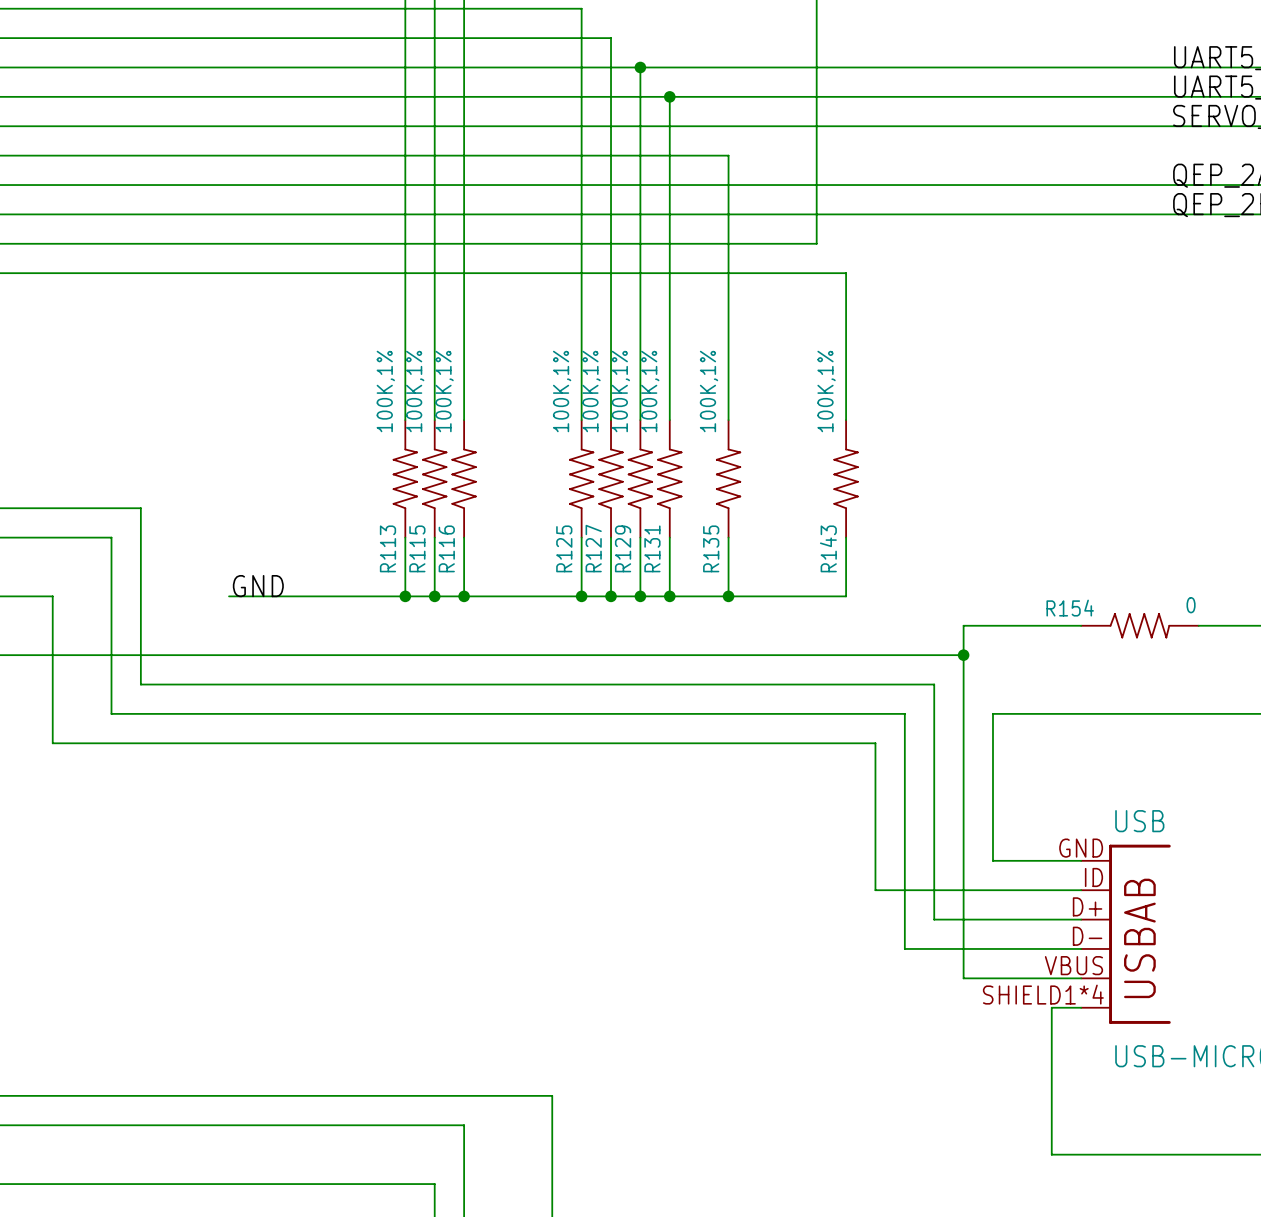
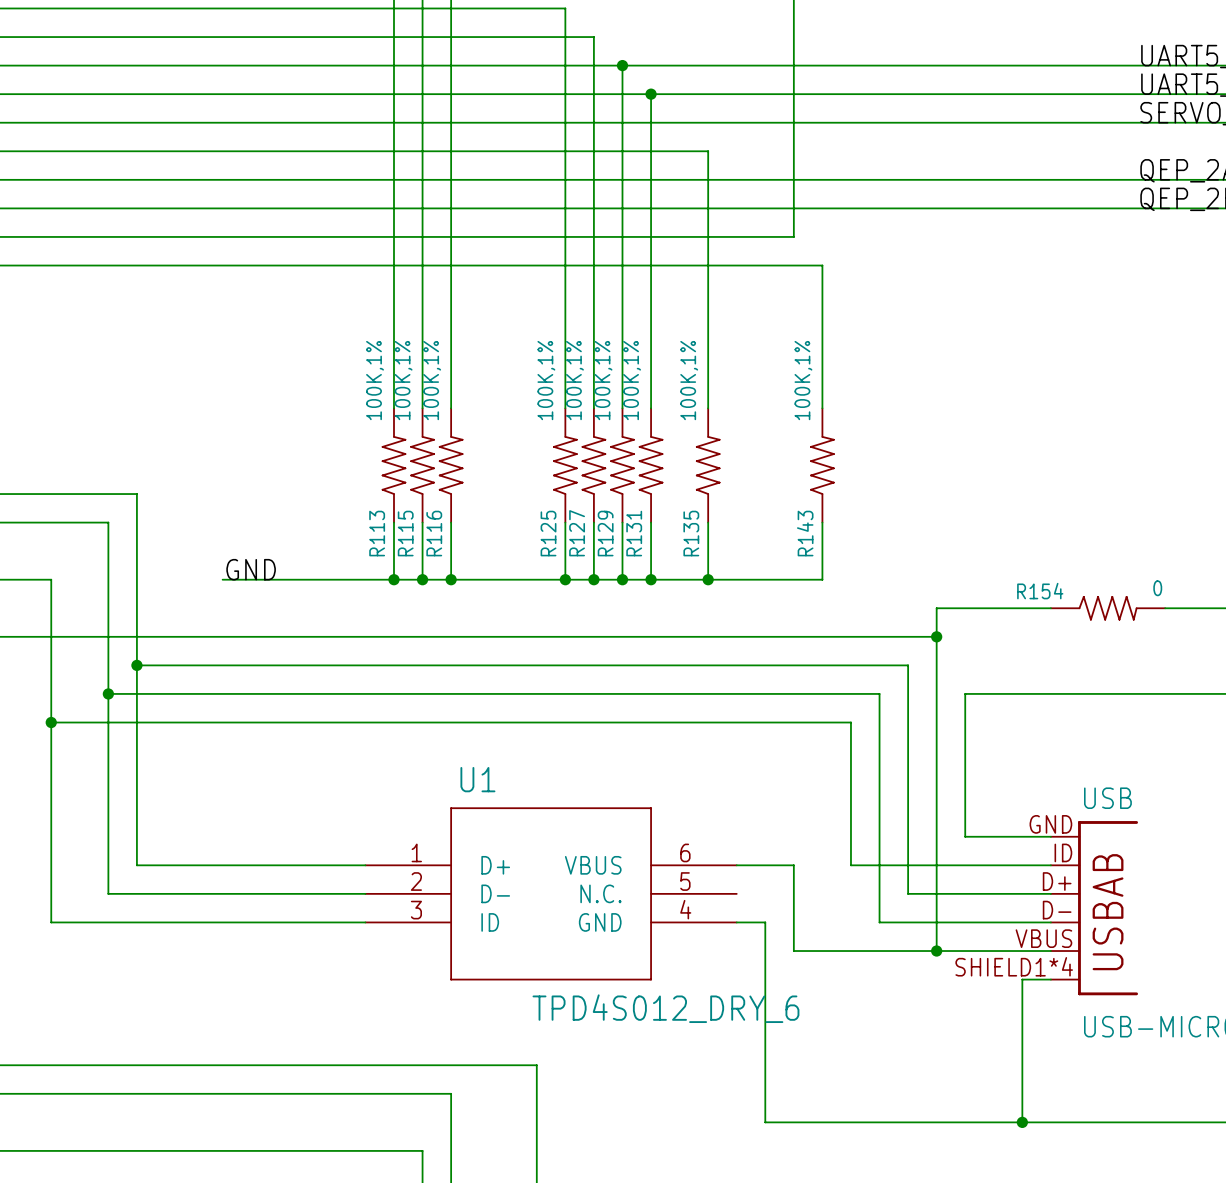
wire: none -> (136, 665) (136, 865) (365, 865)
junction: none -> (136, 665)
wire: none -> (108, 693) (108, 893) (365, 893)
junction: none -> (108, 693)
wire: none -> (51, 722) (51, 922) (365, 922)
junction: none -> (51, 722)
wire: none -> (736, 865) (793, 865) (793, 951) (936, 951)
U1: none -> TPD4S012_DRY_6 (551, 893)
wire: none -> (736, 922) (765, 922) (765, 1122) (1022, 1122)
junction: none -> (936, 951)
junction: none -> (1022, 1122)

